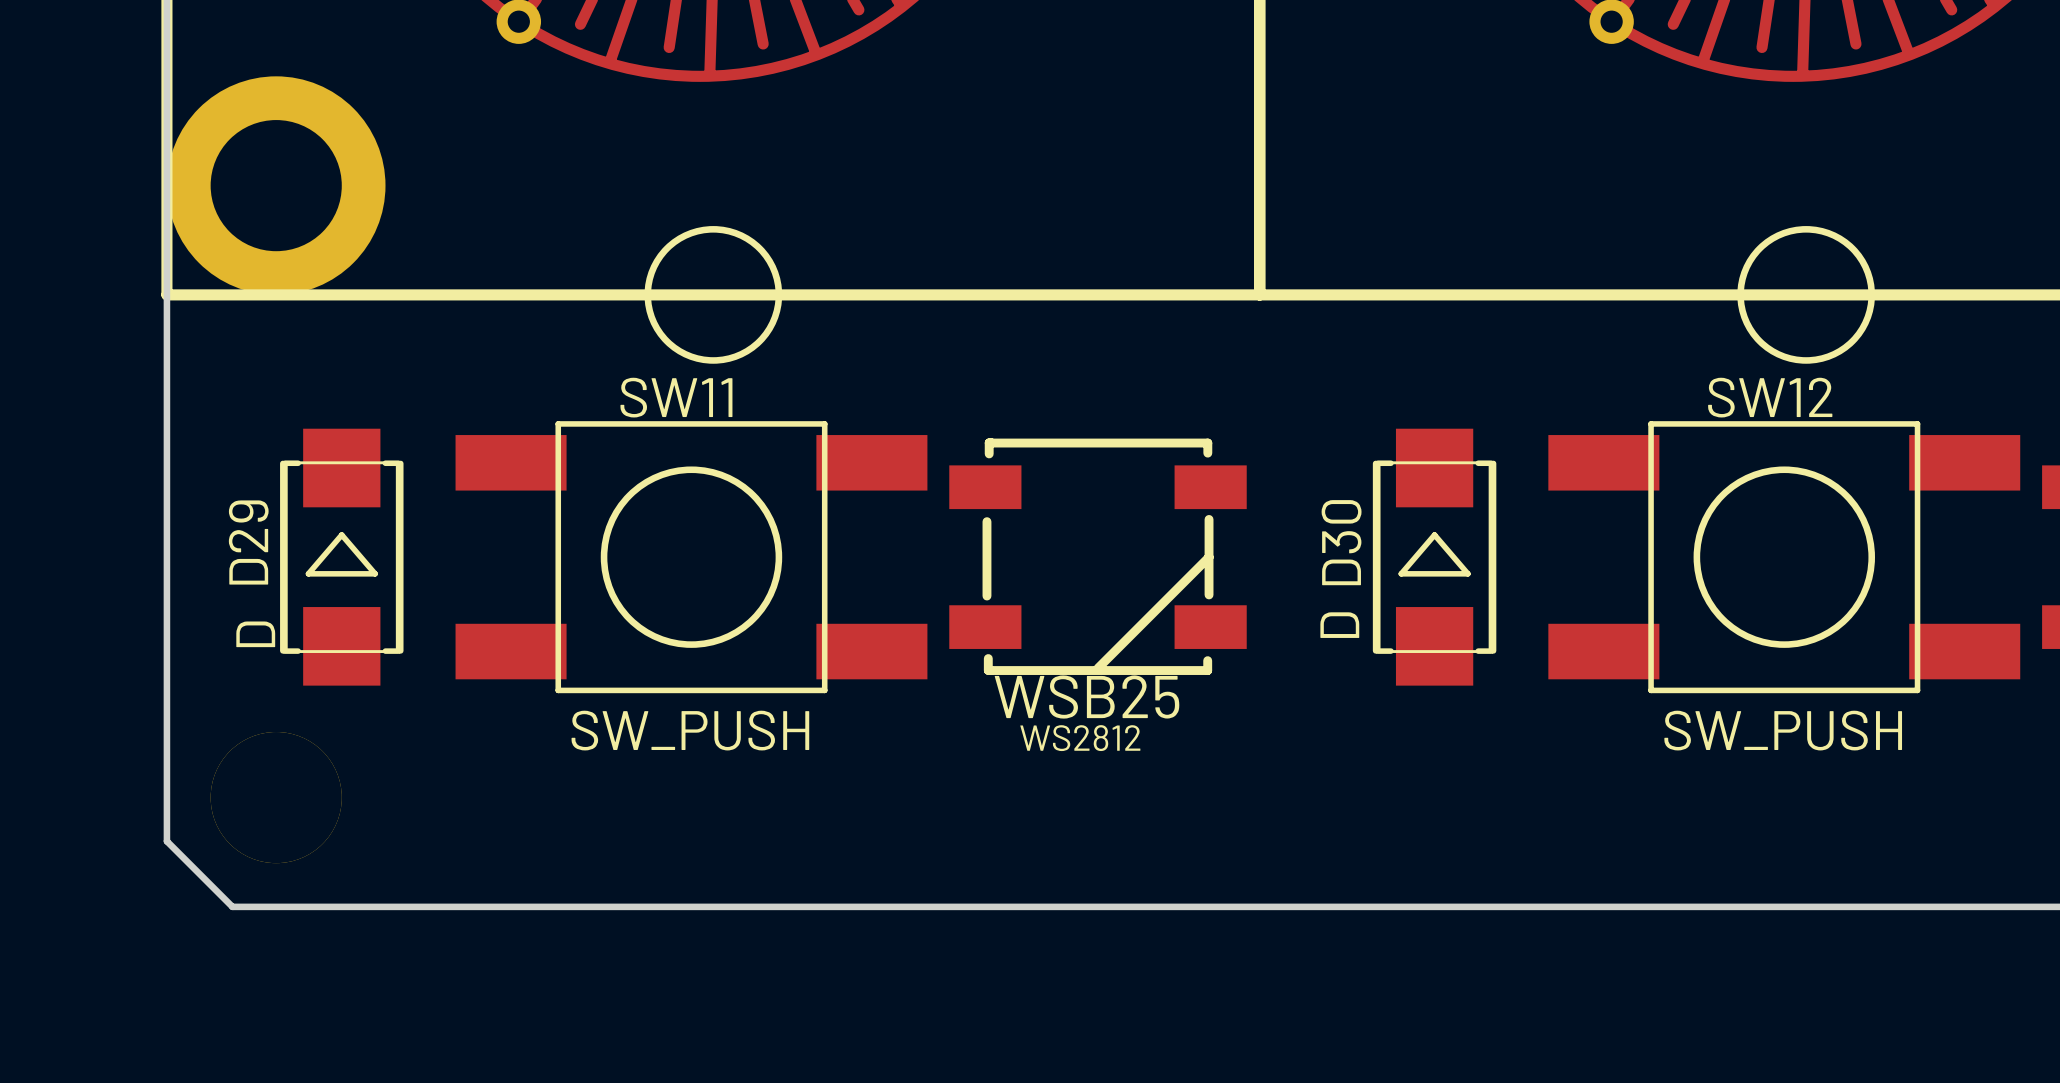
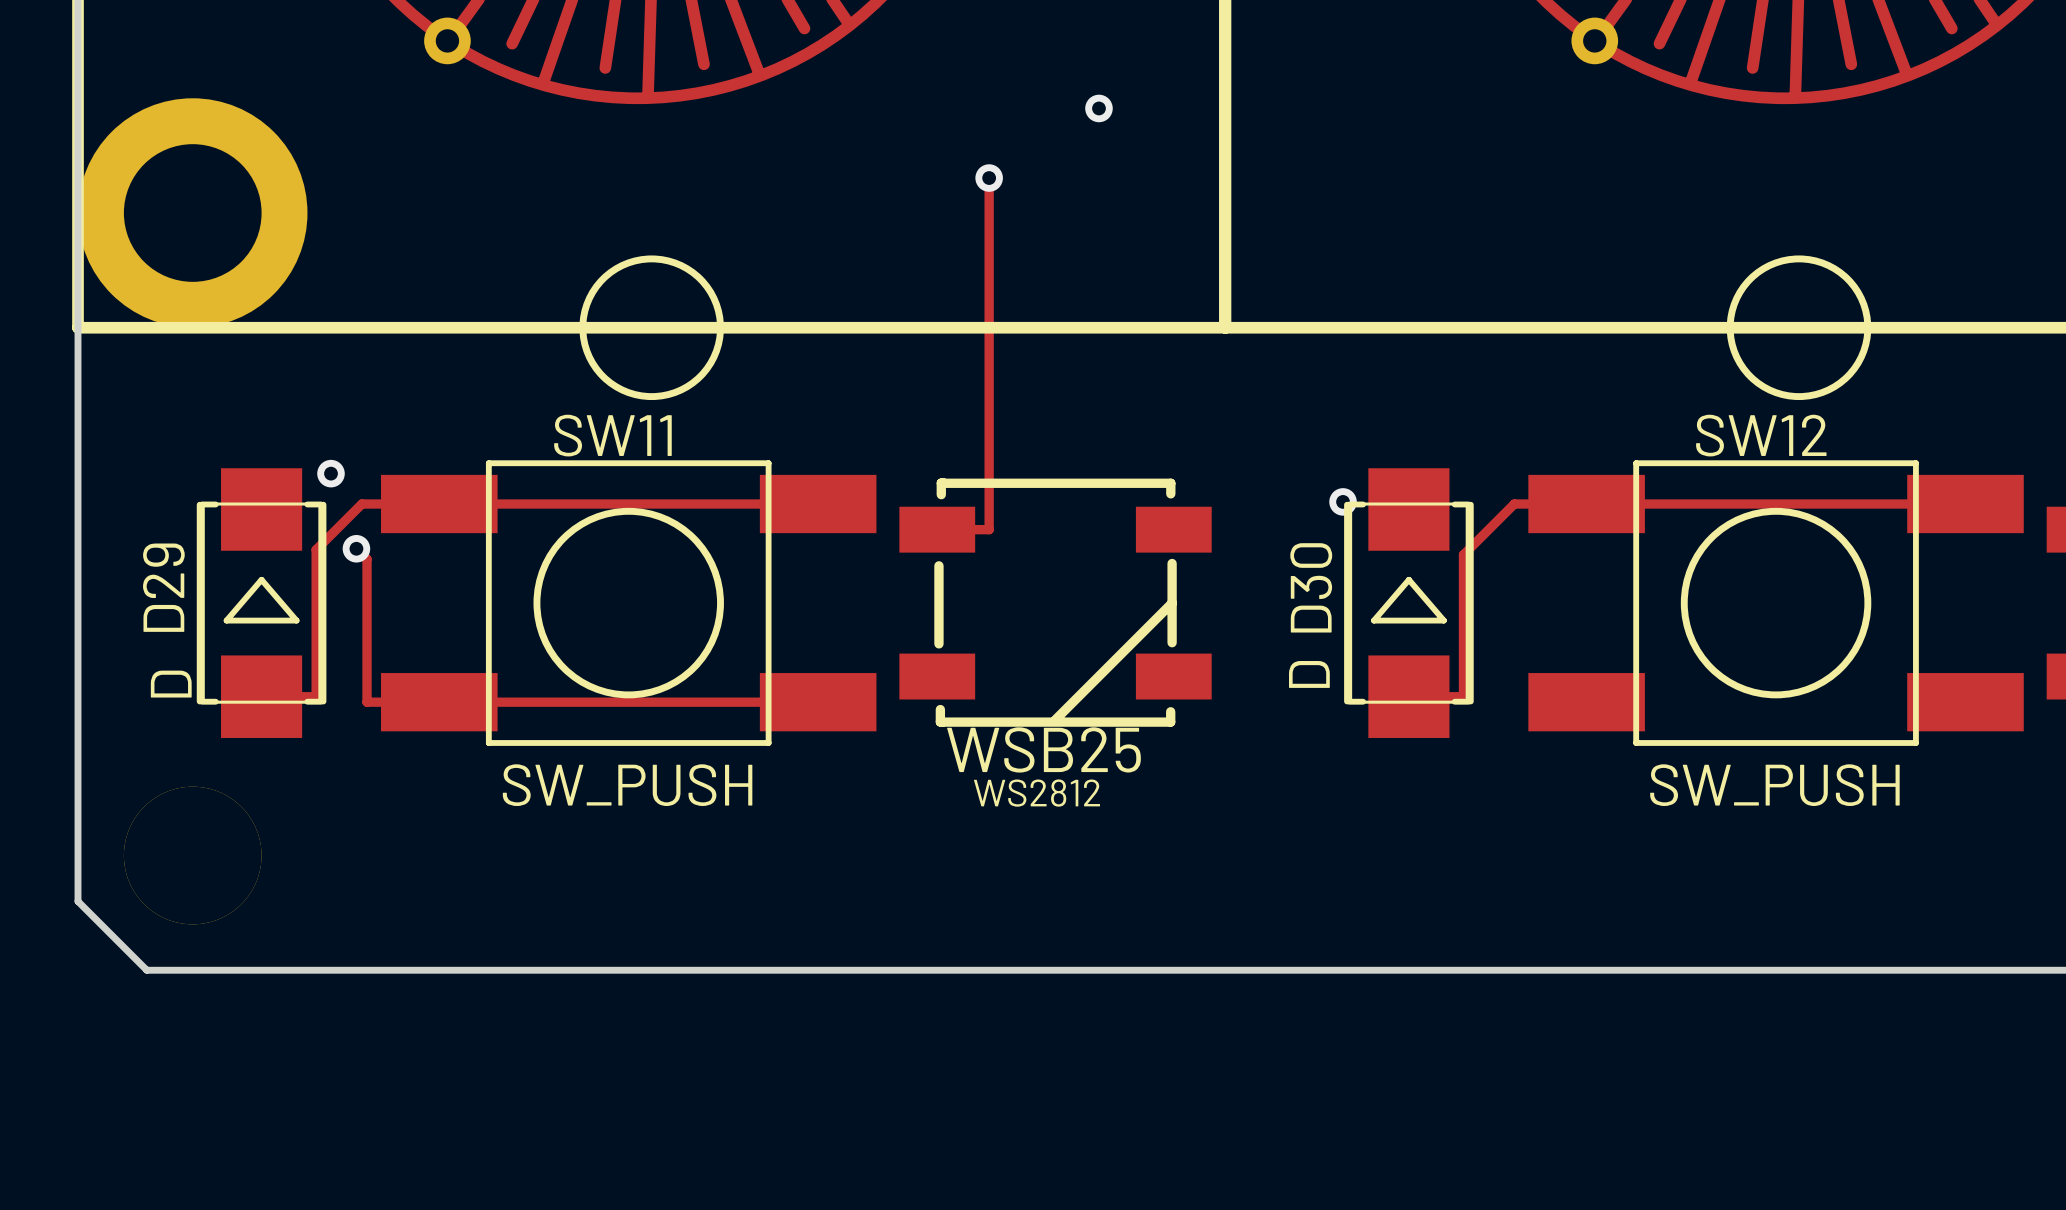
via: none -> (1098, 108)
track: none -> (989, 178) (989, 529) (937, 529)
via: none -> (989, 178)
via: none -> (331, 473)
via: none -> (1343, 501)
track: none -> (818, 504) (361, 504) (316, 549) (316, 696) (261, 696)
track: none -> (1965, 504) (1514, 504) (1463, 554) (1463, 696) (1408, 696)
track: none -> (356, 548) (367, 559) (367, 702) (818, 702)
via: none -> (356, 548)

